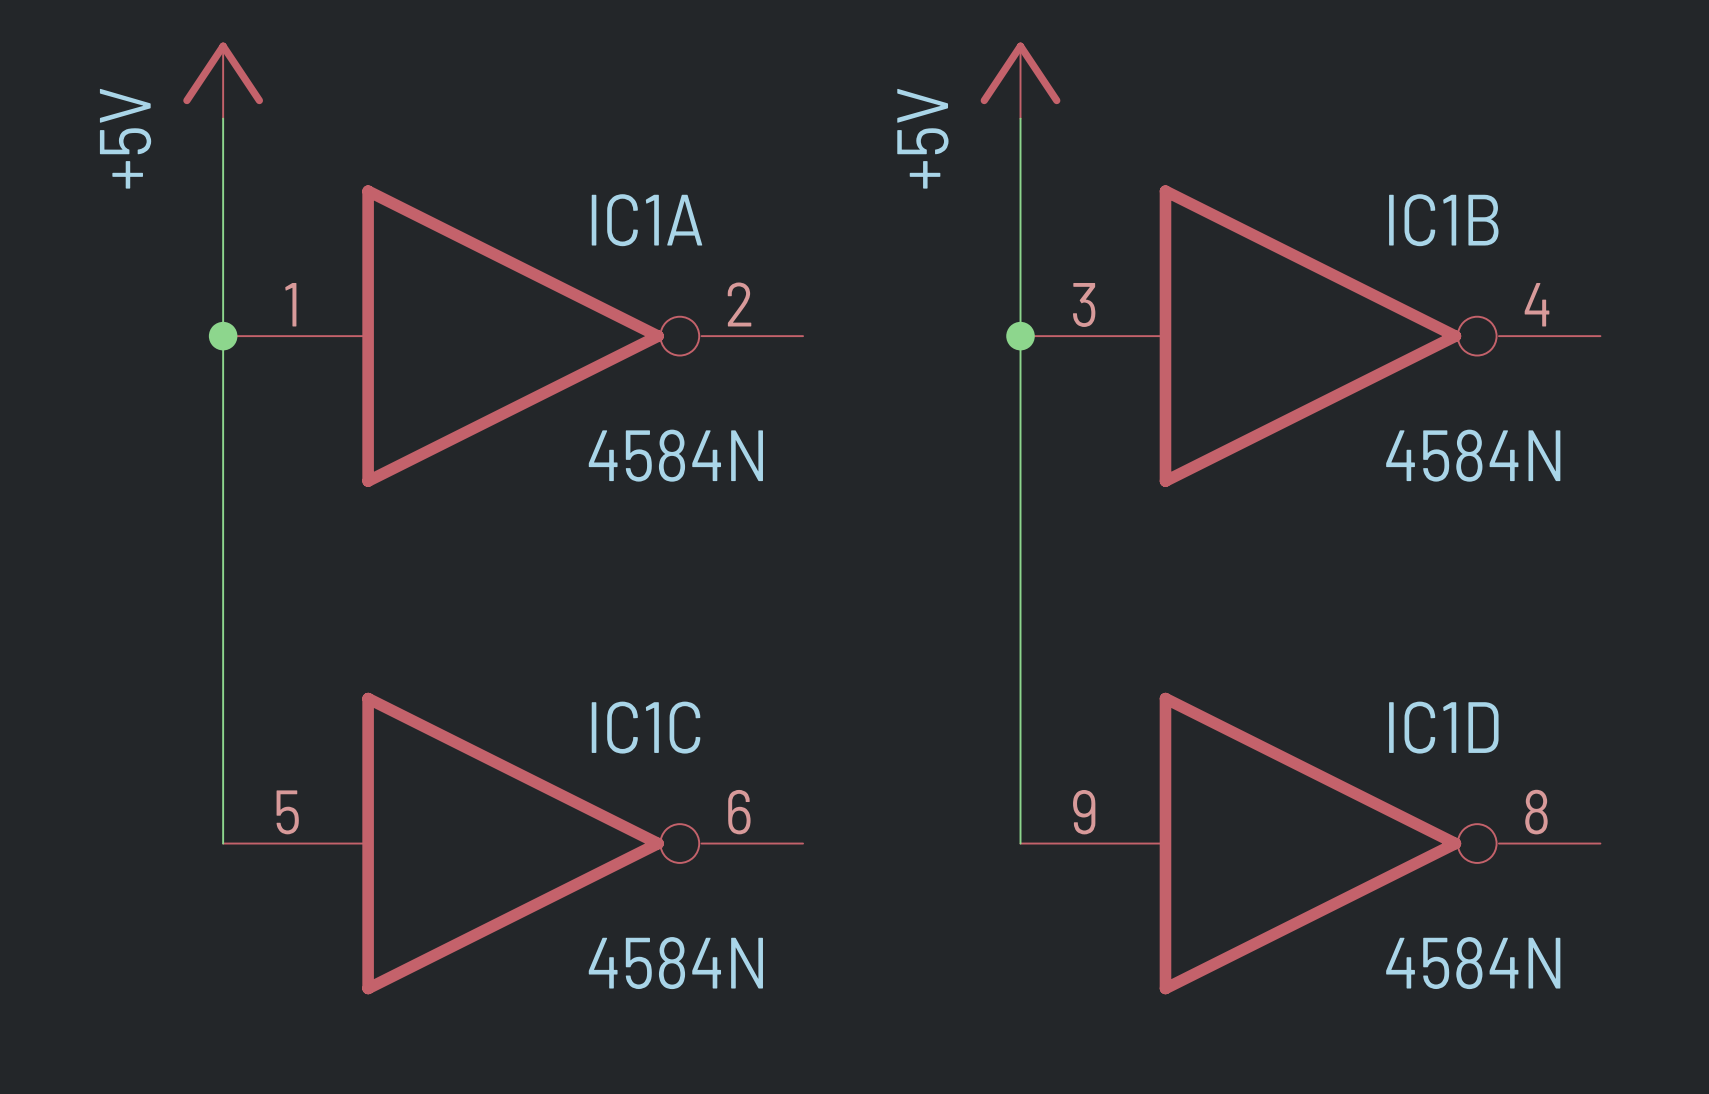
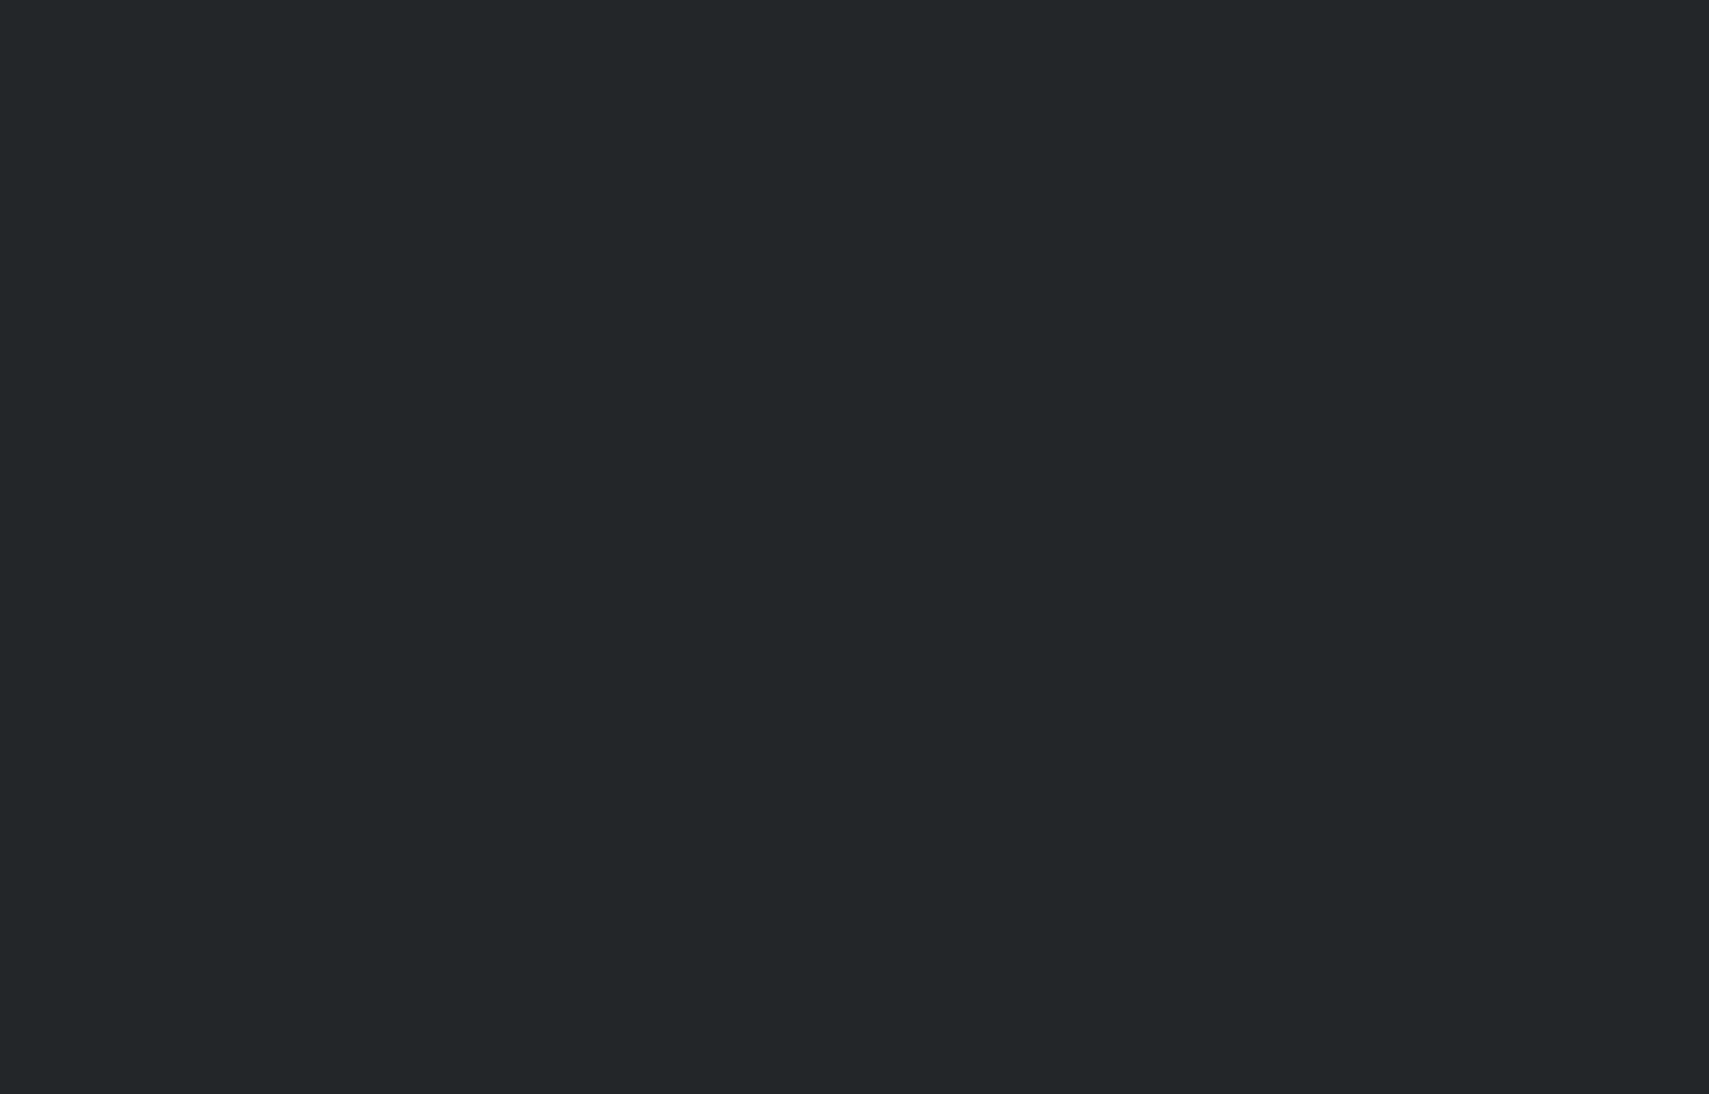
power symbol: +5V (223, 80) -> none
power symbol: +5V (1020, 80) -> none
wire: (223, 118) (223, 843) -> none
wire: (1020, 118) (1020, 843) -> none
junction: (223, 336) -> none
IC1A: 4584N (513, 336) -> none
junction: (1020, 336) -> none
IC1B: 4584N (1310, 336) -> none
IC1C: 4584N (513, 843) -> none
IC1D: 4584N (1310, 843) -> none

